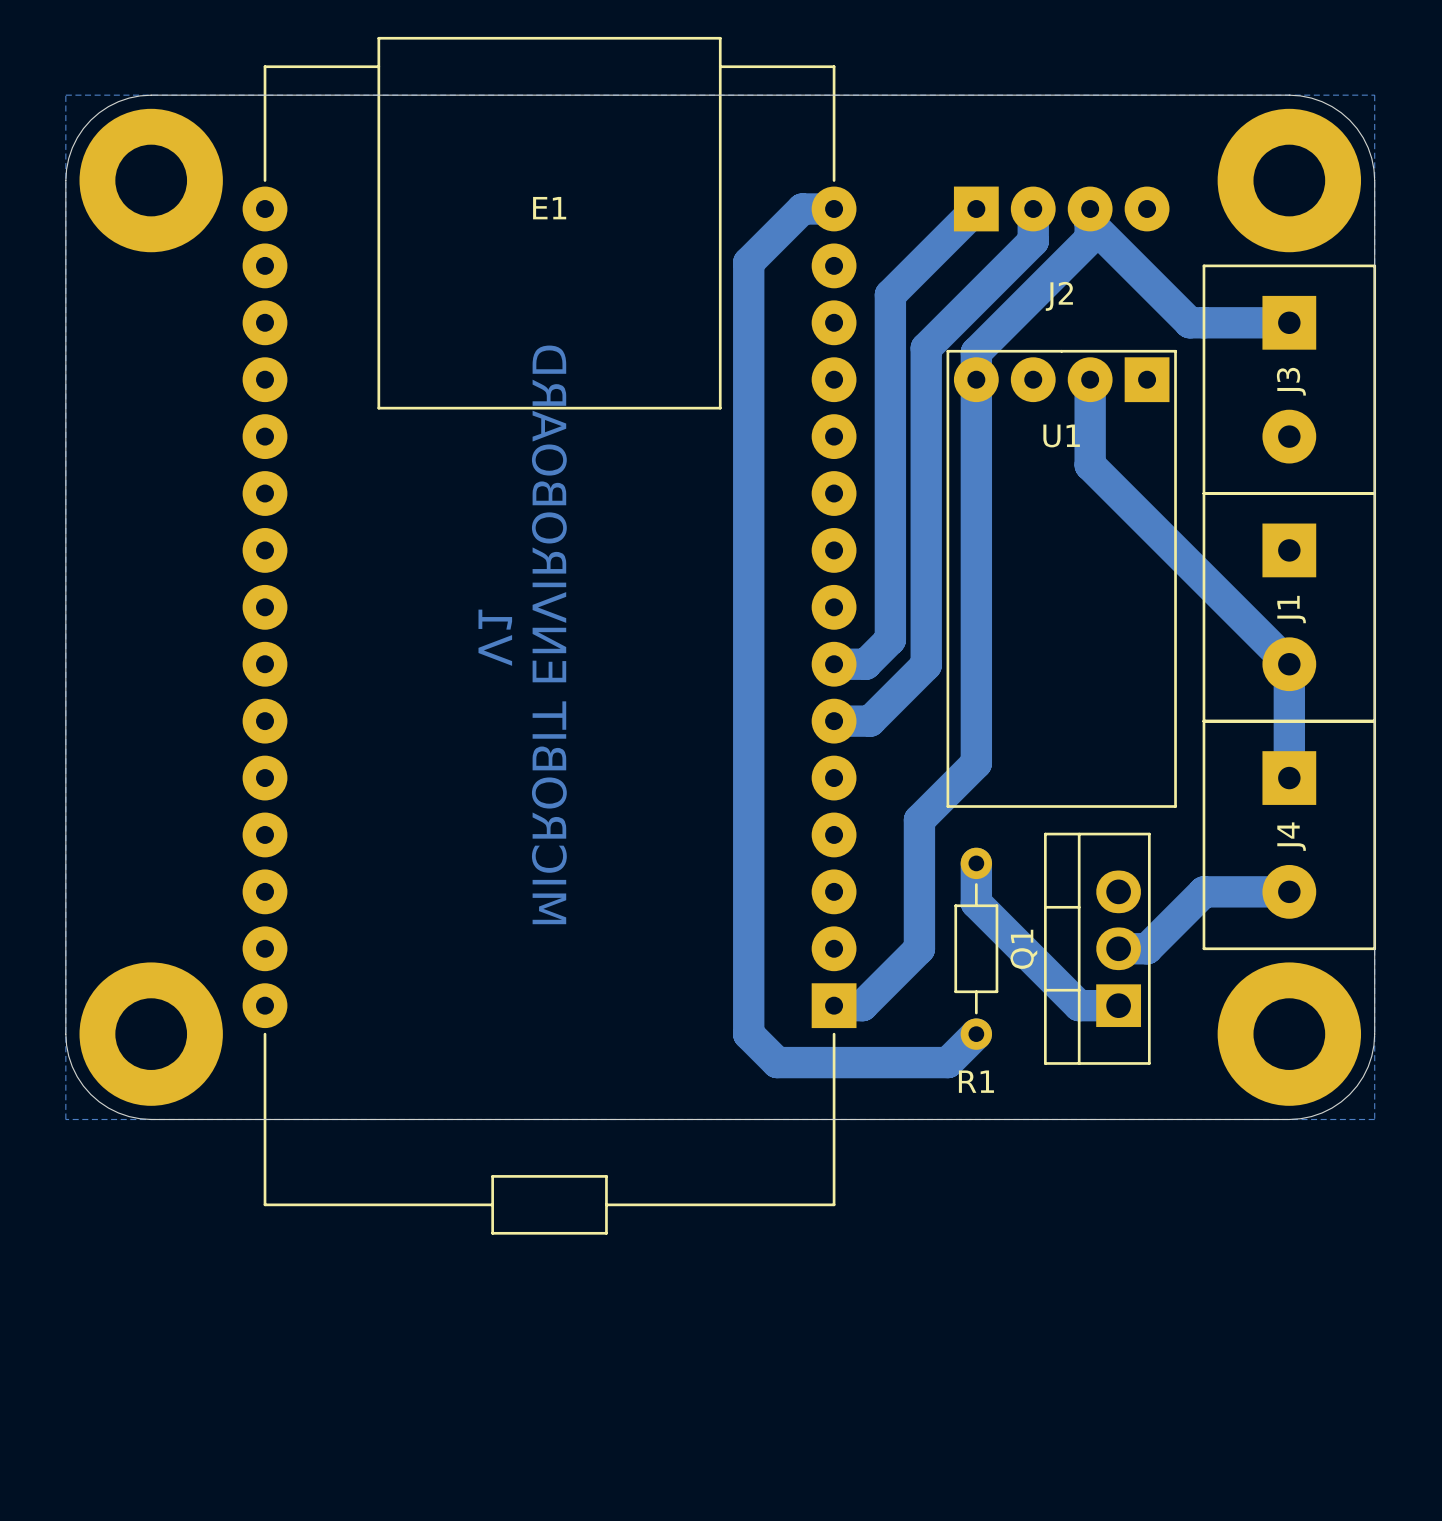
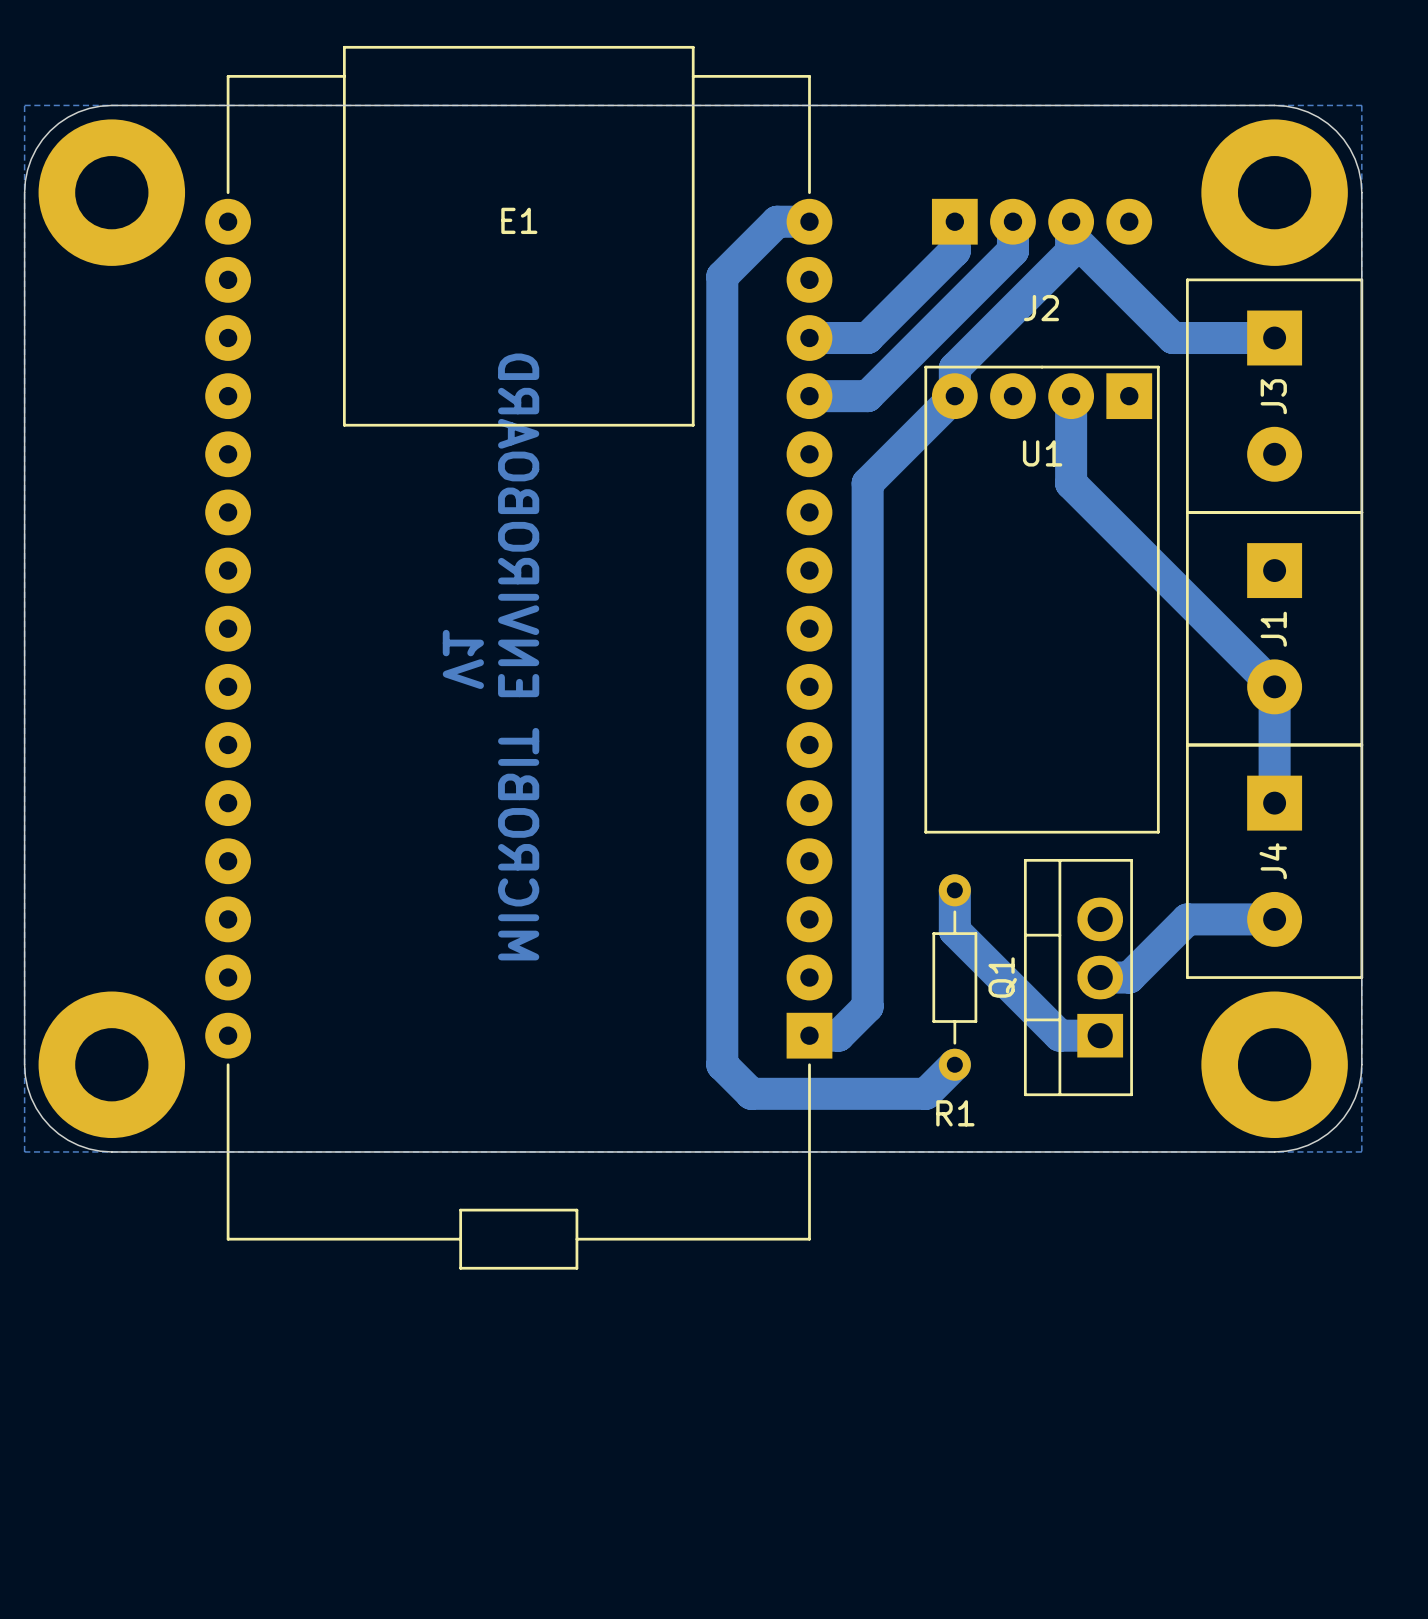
bottom track: none -> (954, 218) (954, 250) (867, 338) (809, 338)
bottom track: (976, 208) (890, 294) (890, 639) (865, 664) (834, 664) -> none
bottom track: (1033, 237) (1033, 241) (926, 348) (926, 665) (870, 721) (834, 721) -> (1012, 250) (867, 396) (809, 396)
bottom track: (976, 379) (976, 763) (919, 820) (919, 948) (890, 977) -> (954, 396) (867, 483) (867, 1006)

